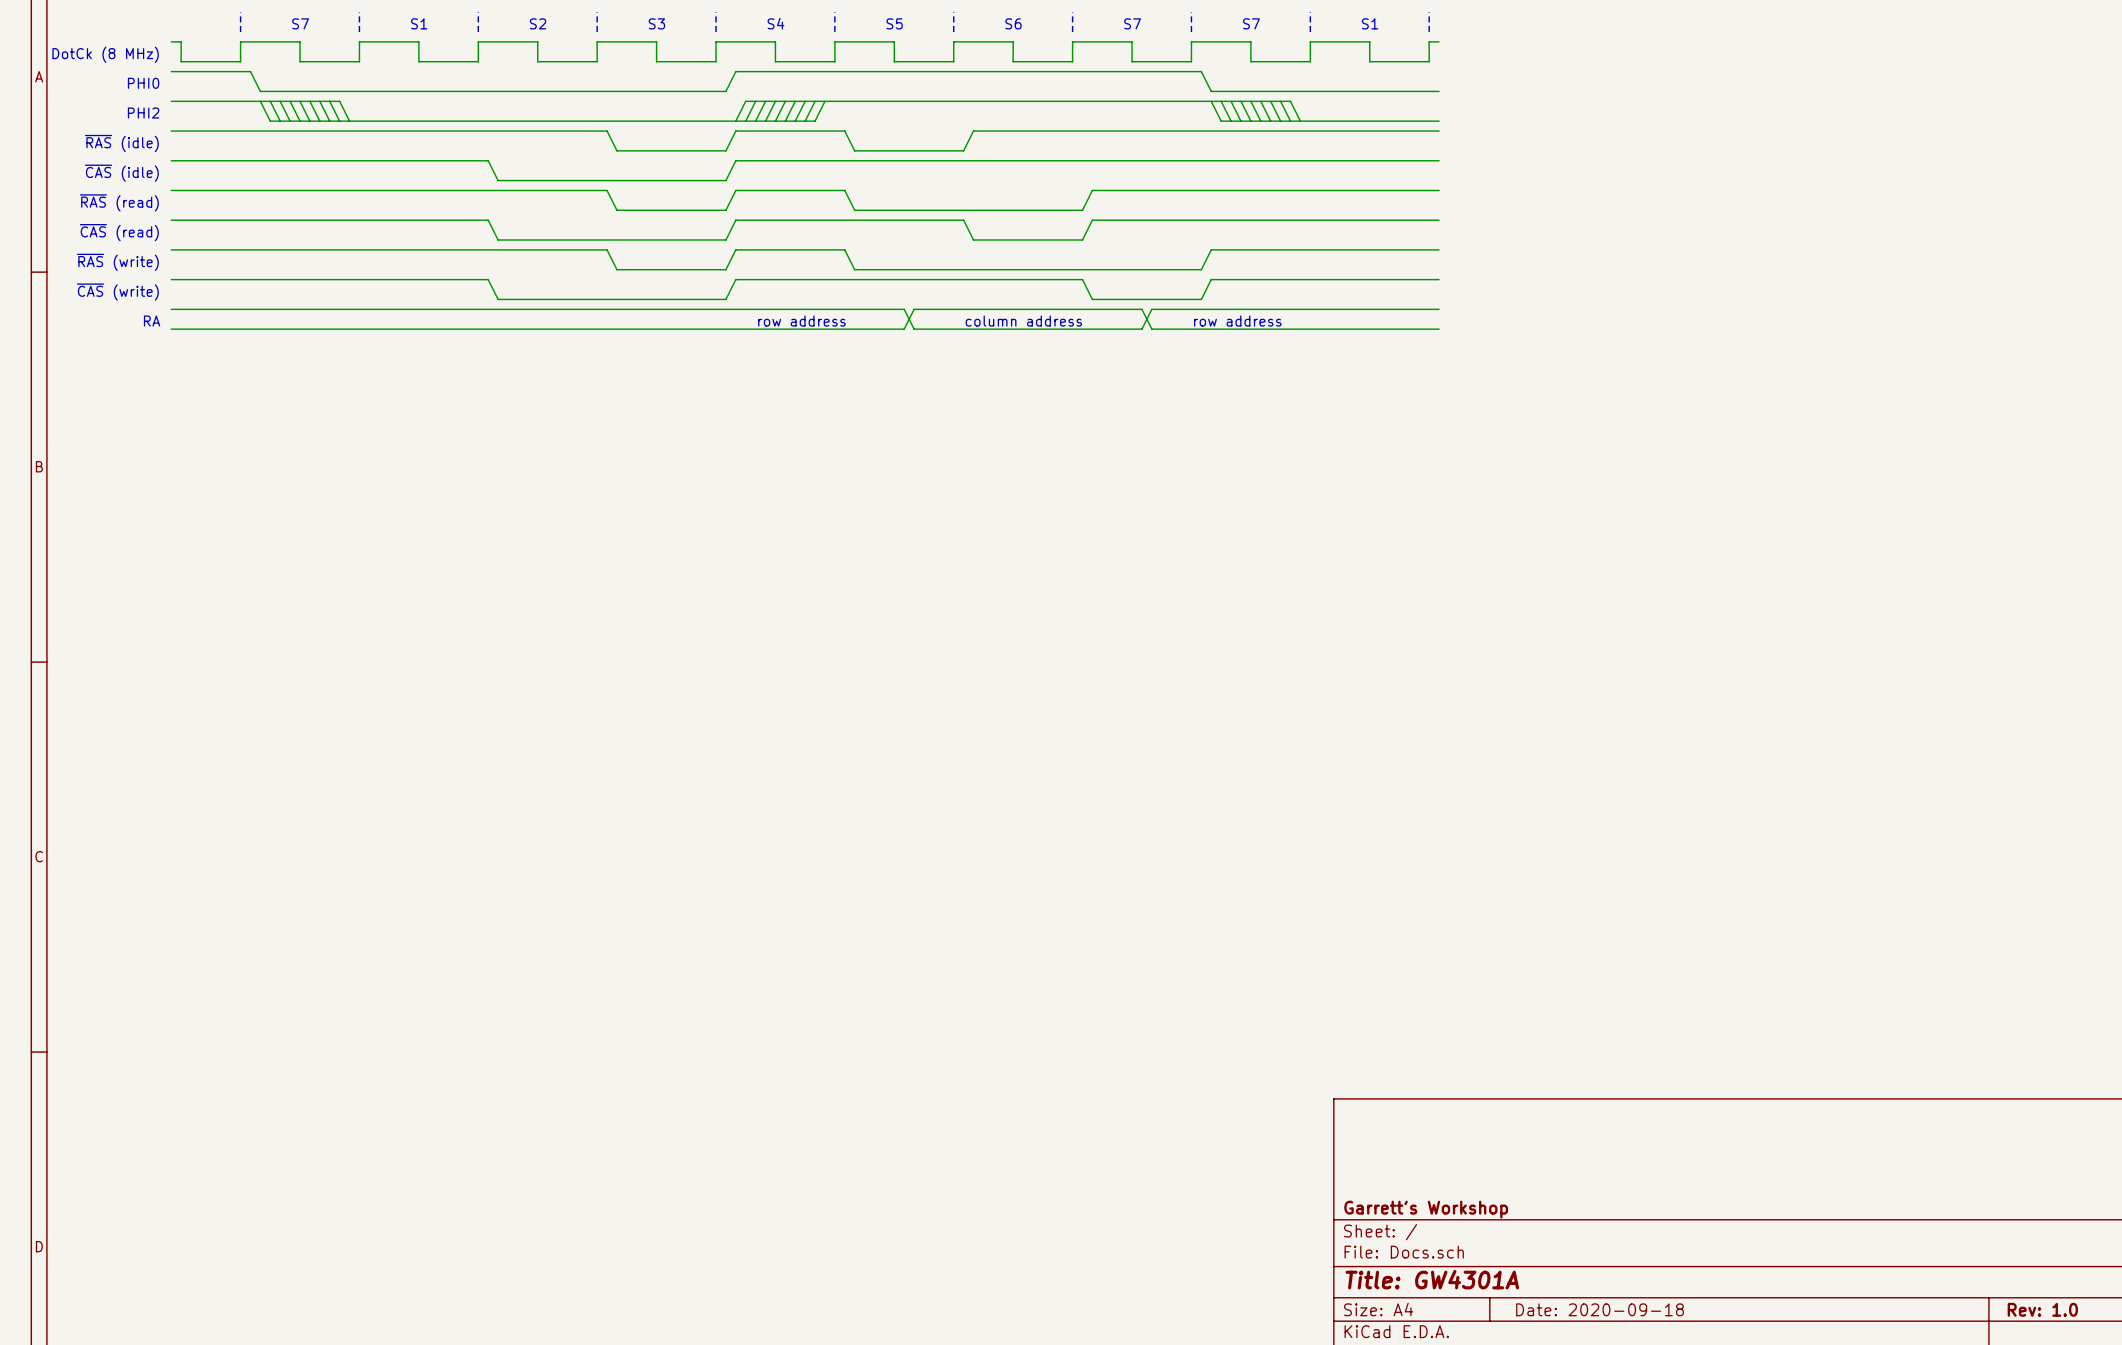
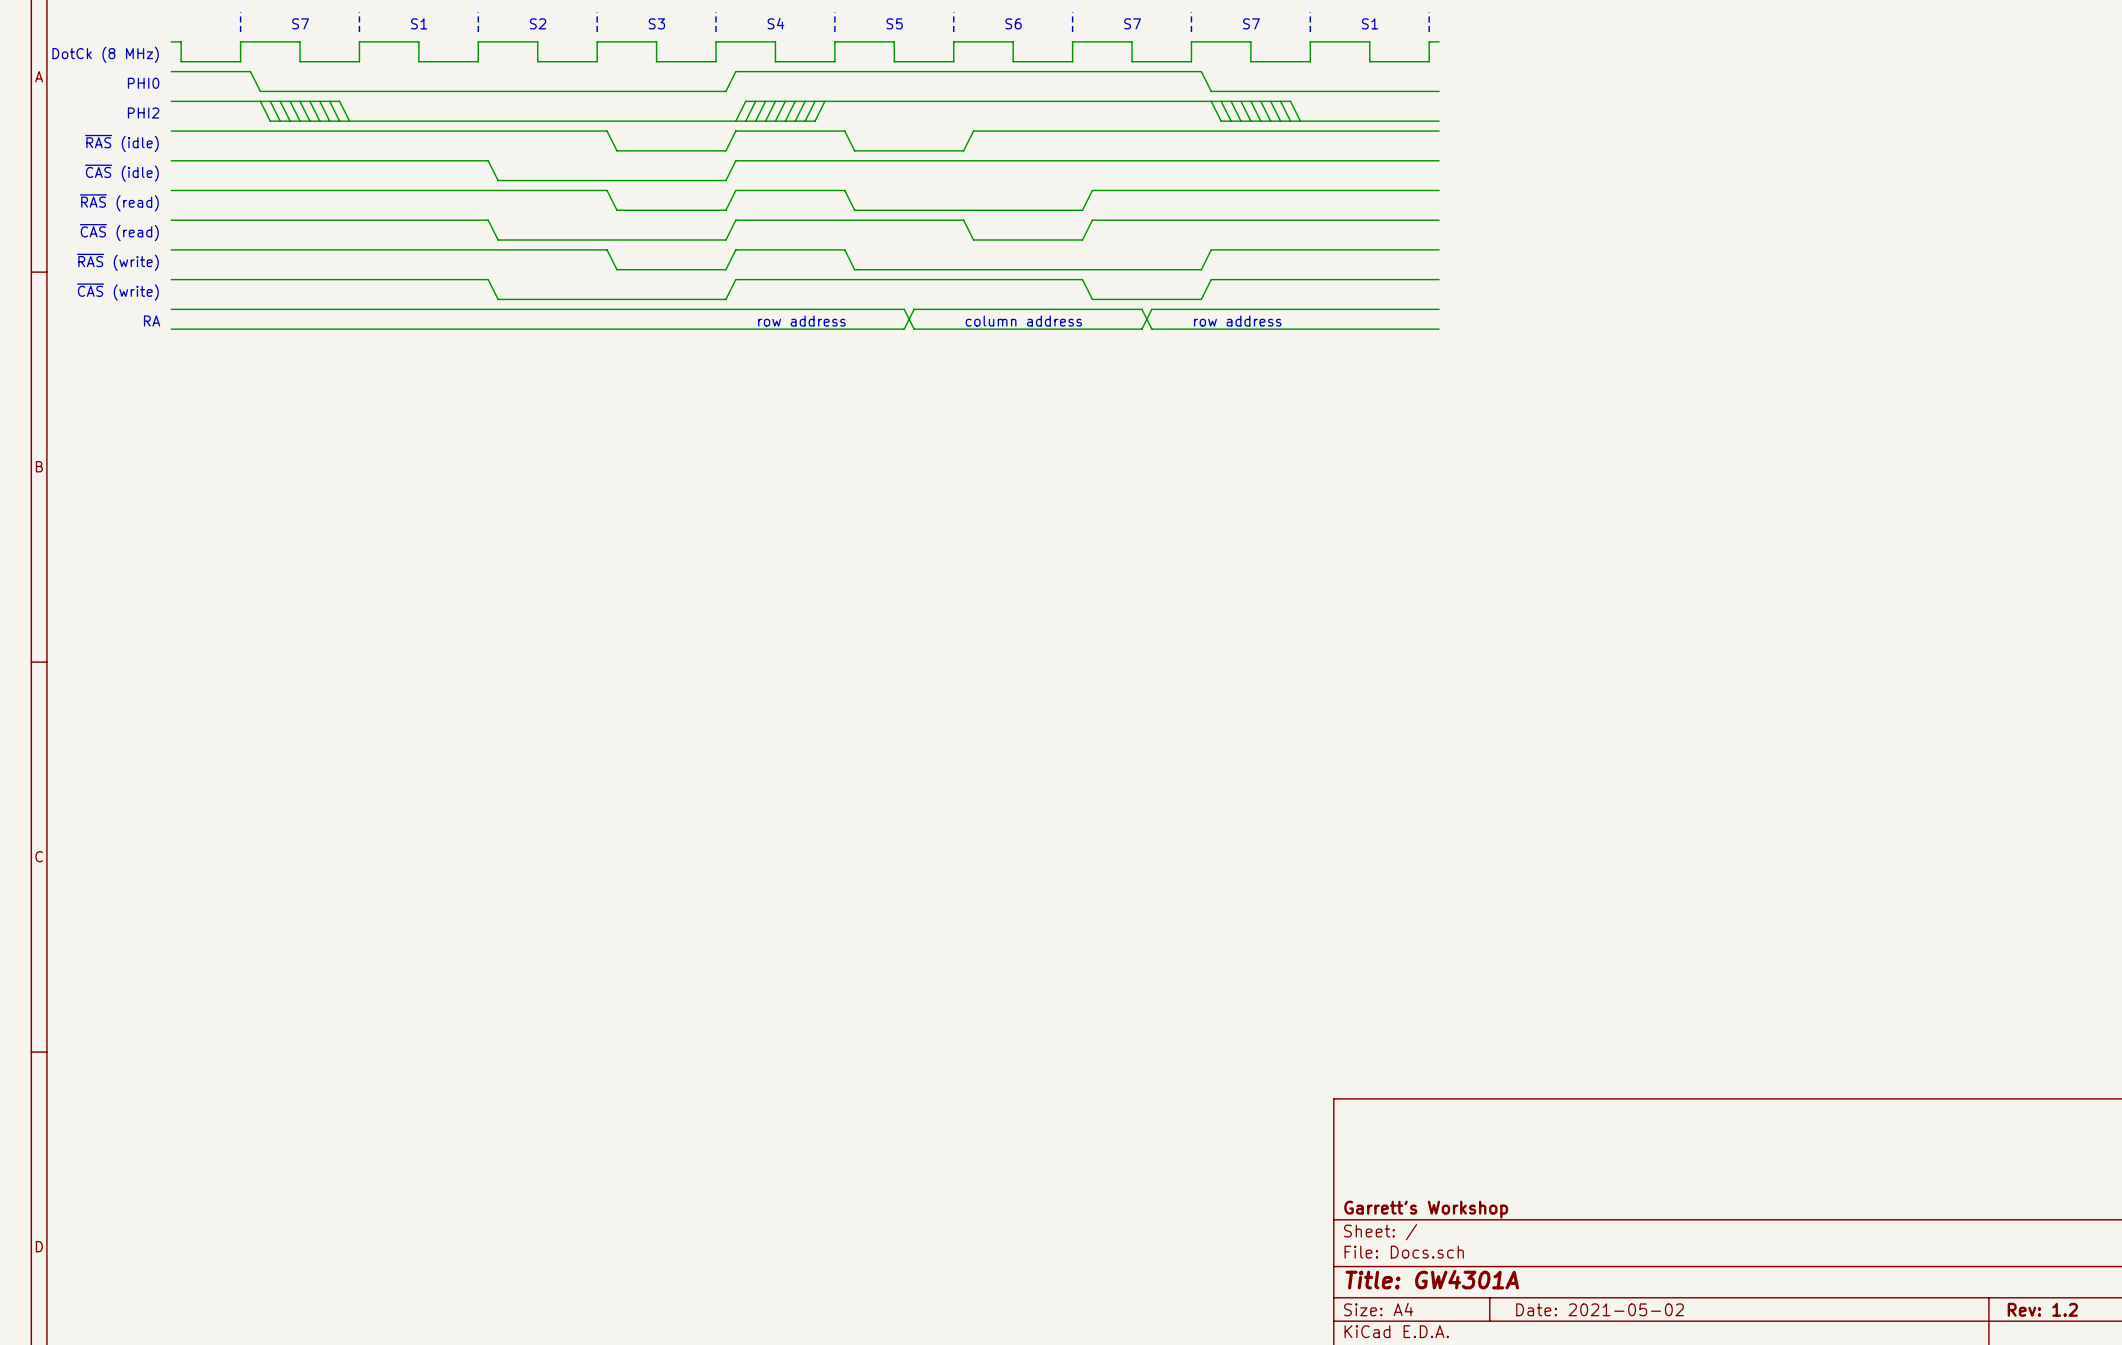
title block: Date: 2020-09-18 (1600, 1309) -> Date: 2021-05-02 (1600, 1309)
title block: Rev: 1.0 (2042, 1309) -> Rev: 1.2 (2042, 1309)

